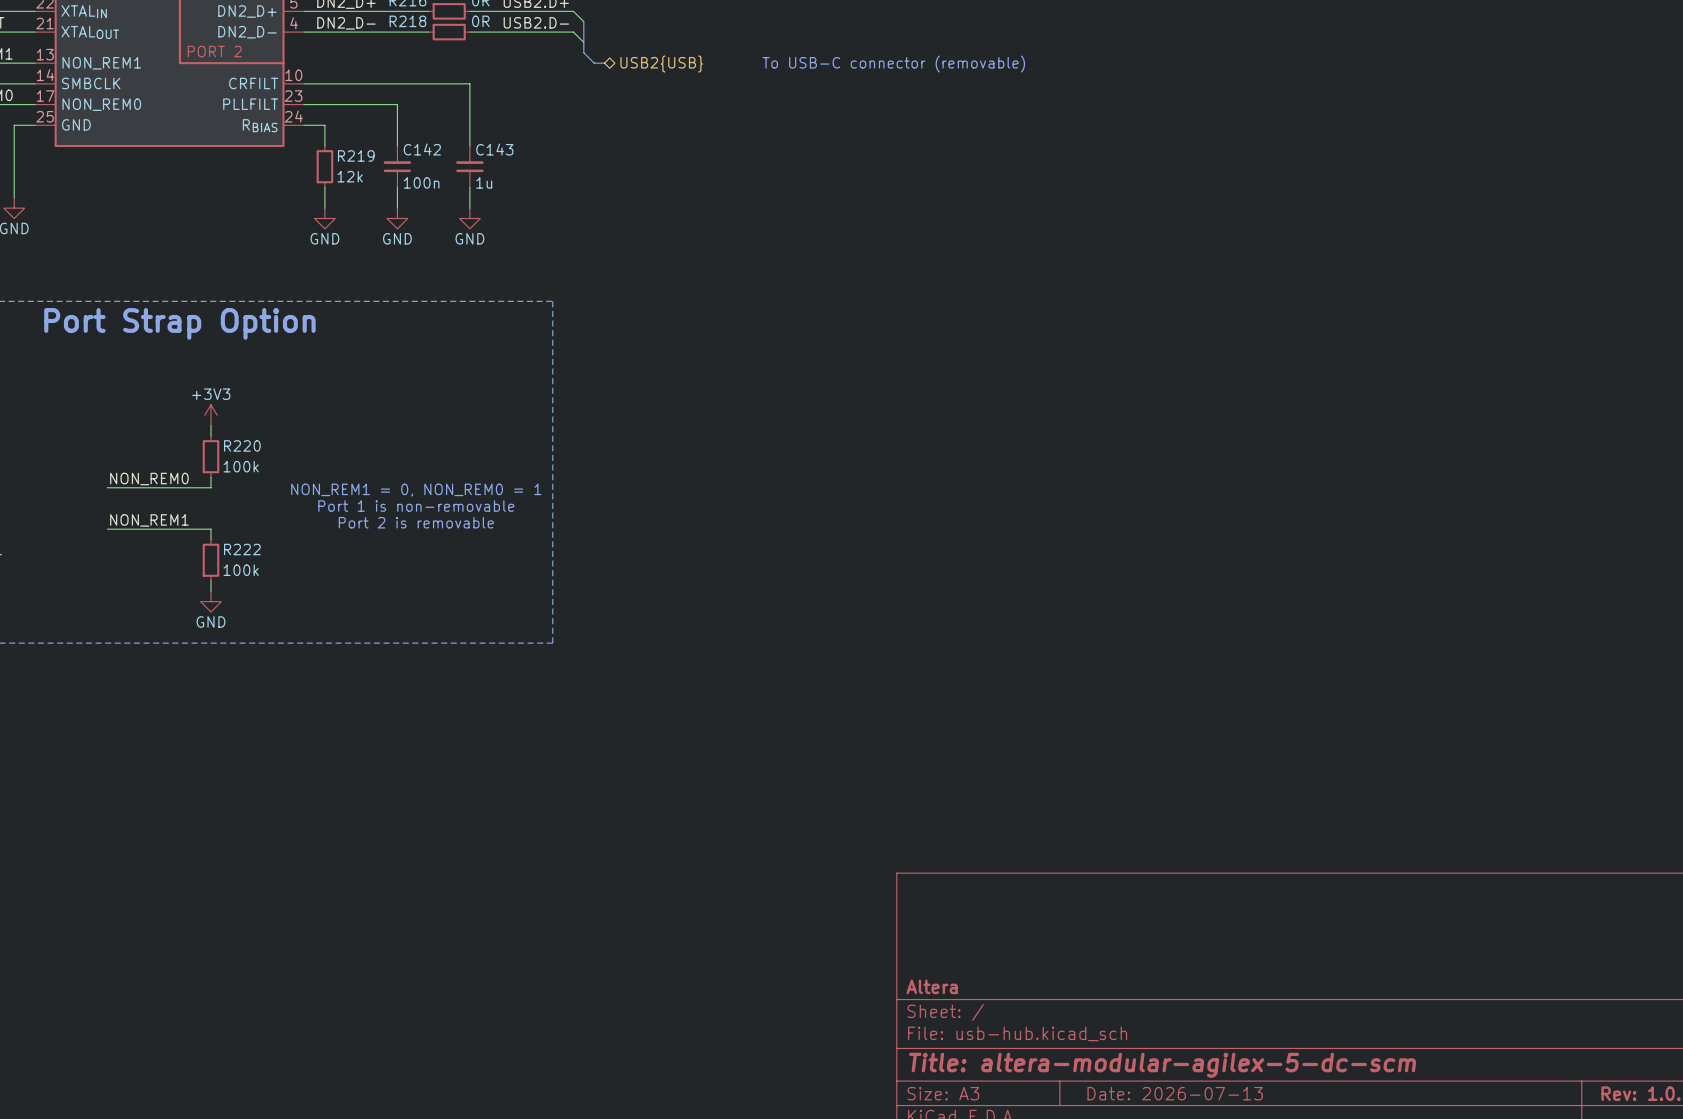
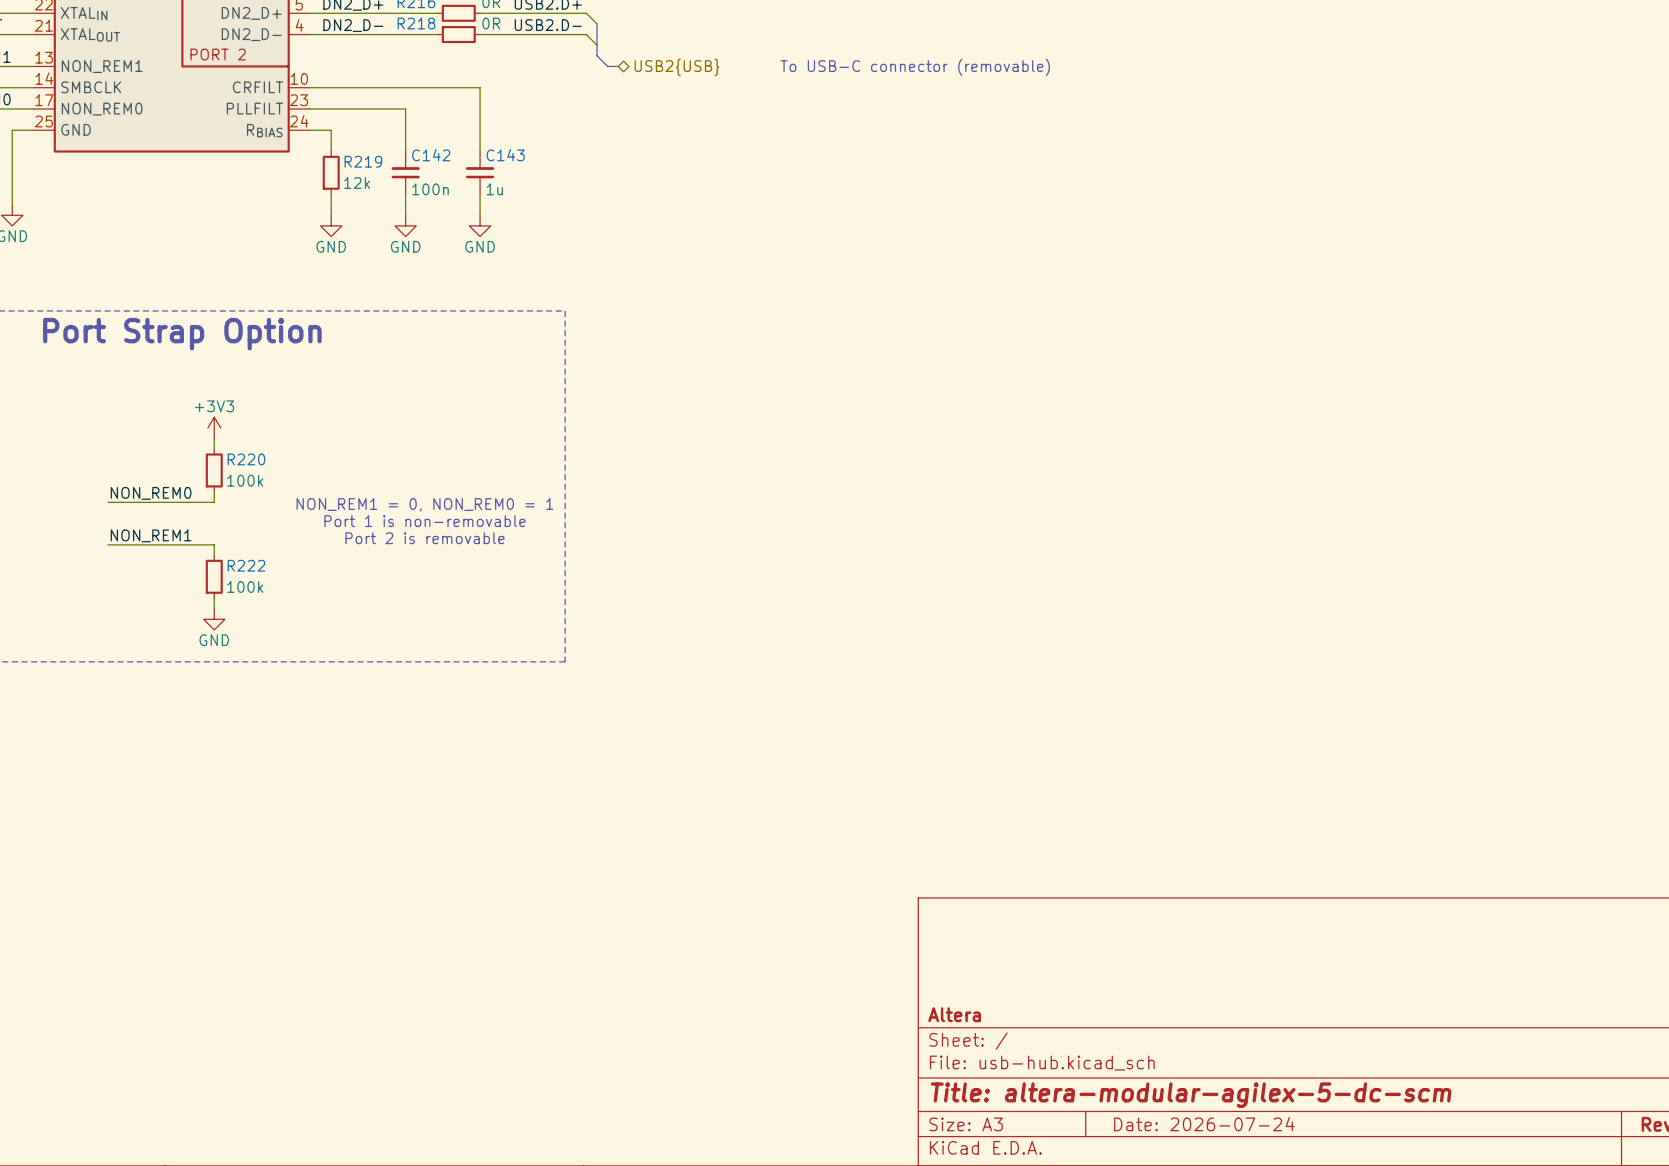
title block: Date: 2026-07-13 (1175, 1093) -> Date: 2026-07-24 (1204, 1124)

